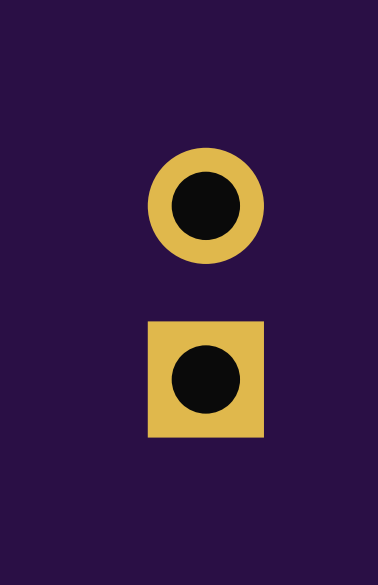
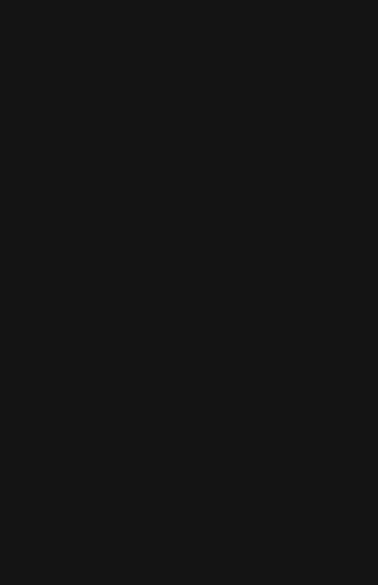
part: (205, 292) -> none

